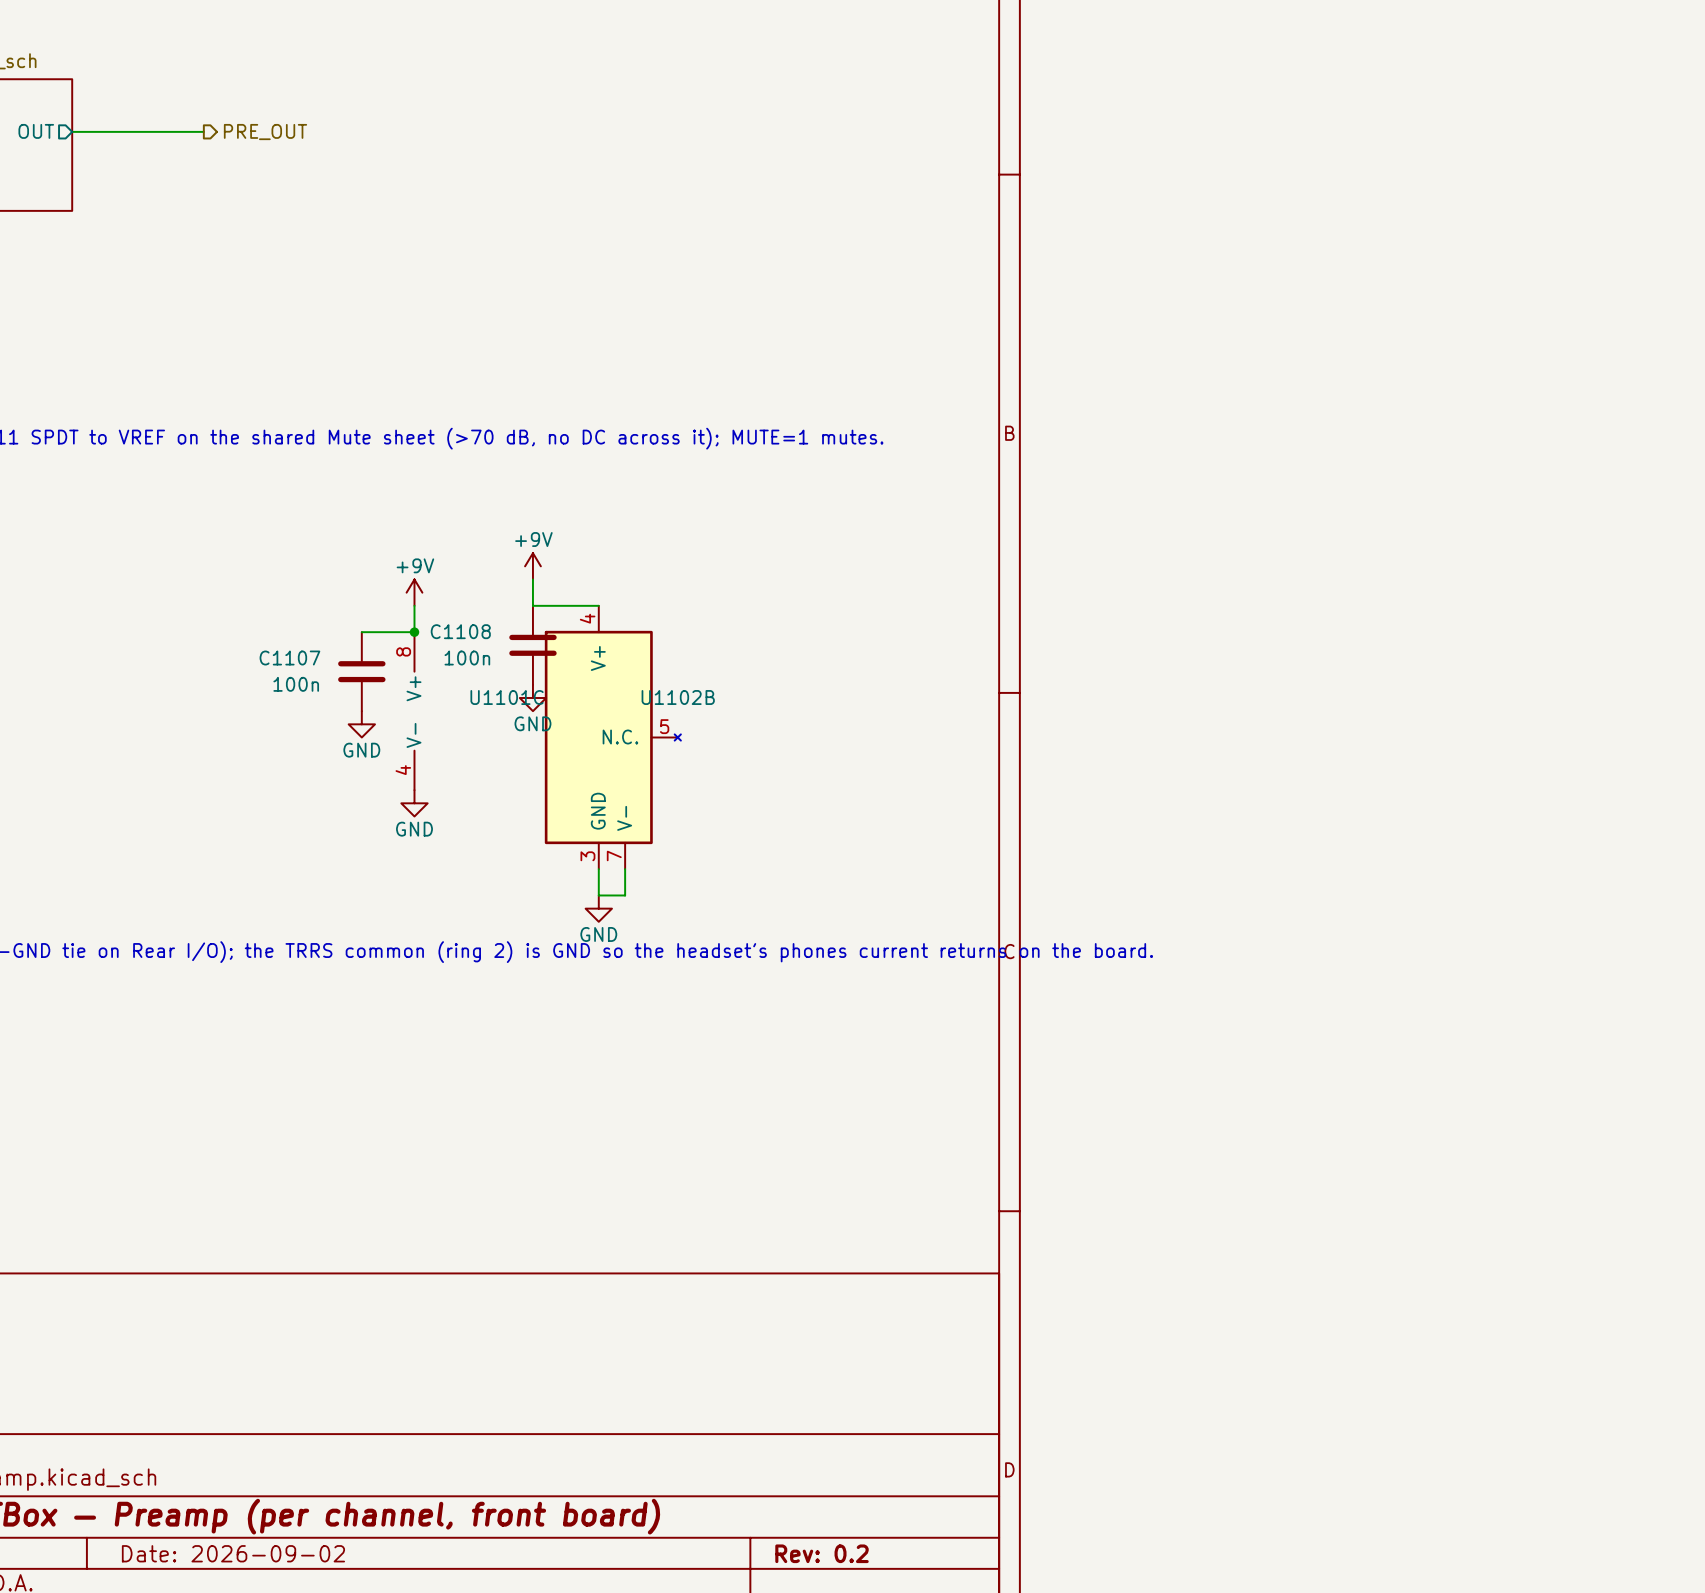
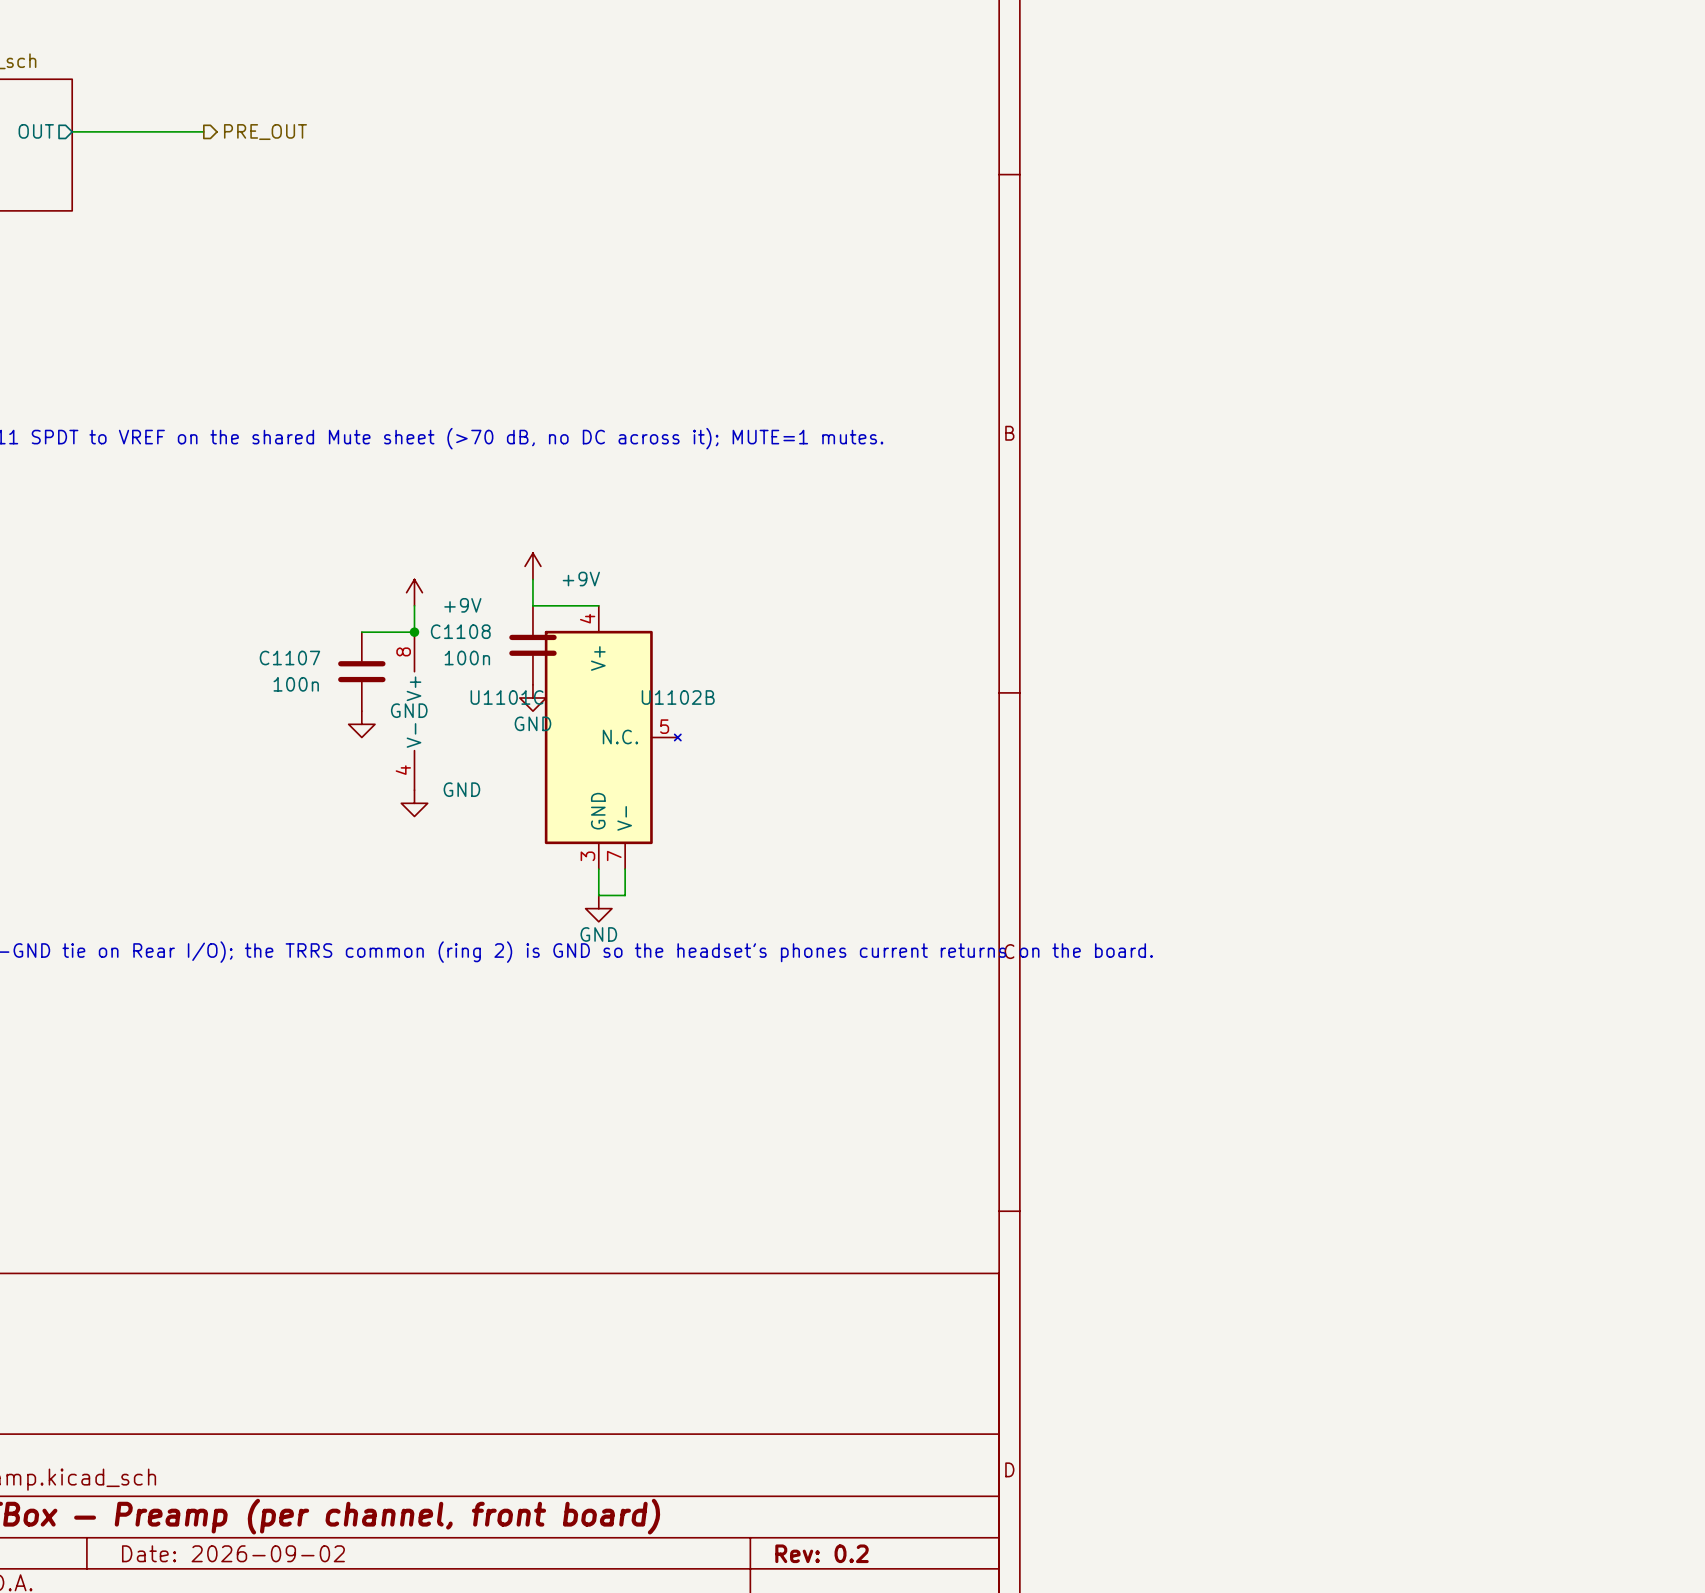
power symbol text position: +9V (533, 539) -> +9V (581, 579)
power symbol text position: +9V (415, 565) -> +9V (462, 605)
power symbol text position: GND (361, 750) -> GND (409, 710)
power symbol text position: GND (414, 829) -> GND (461, 789)

